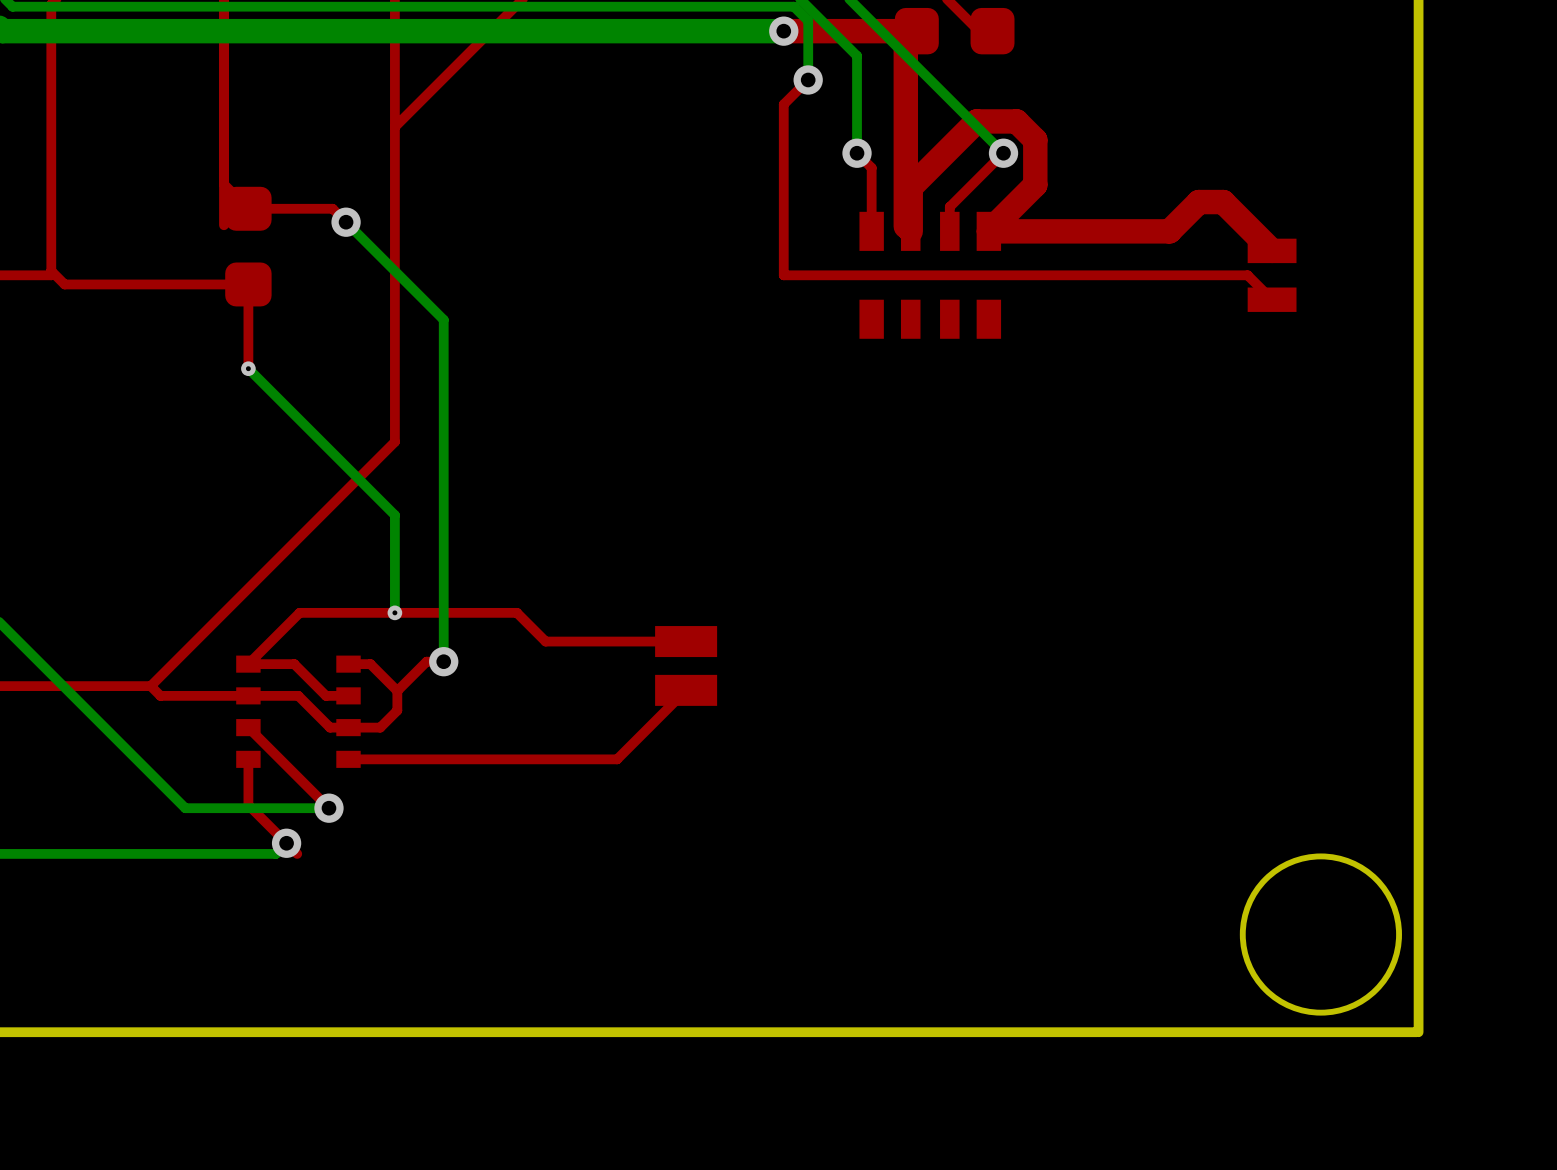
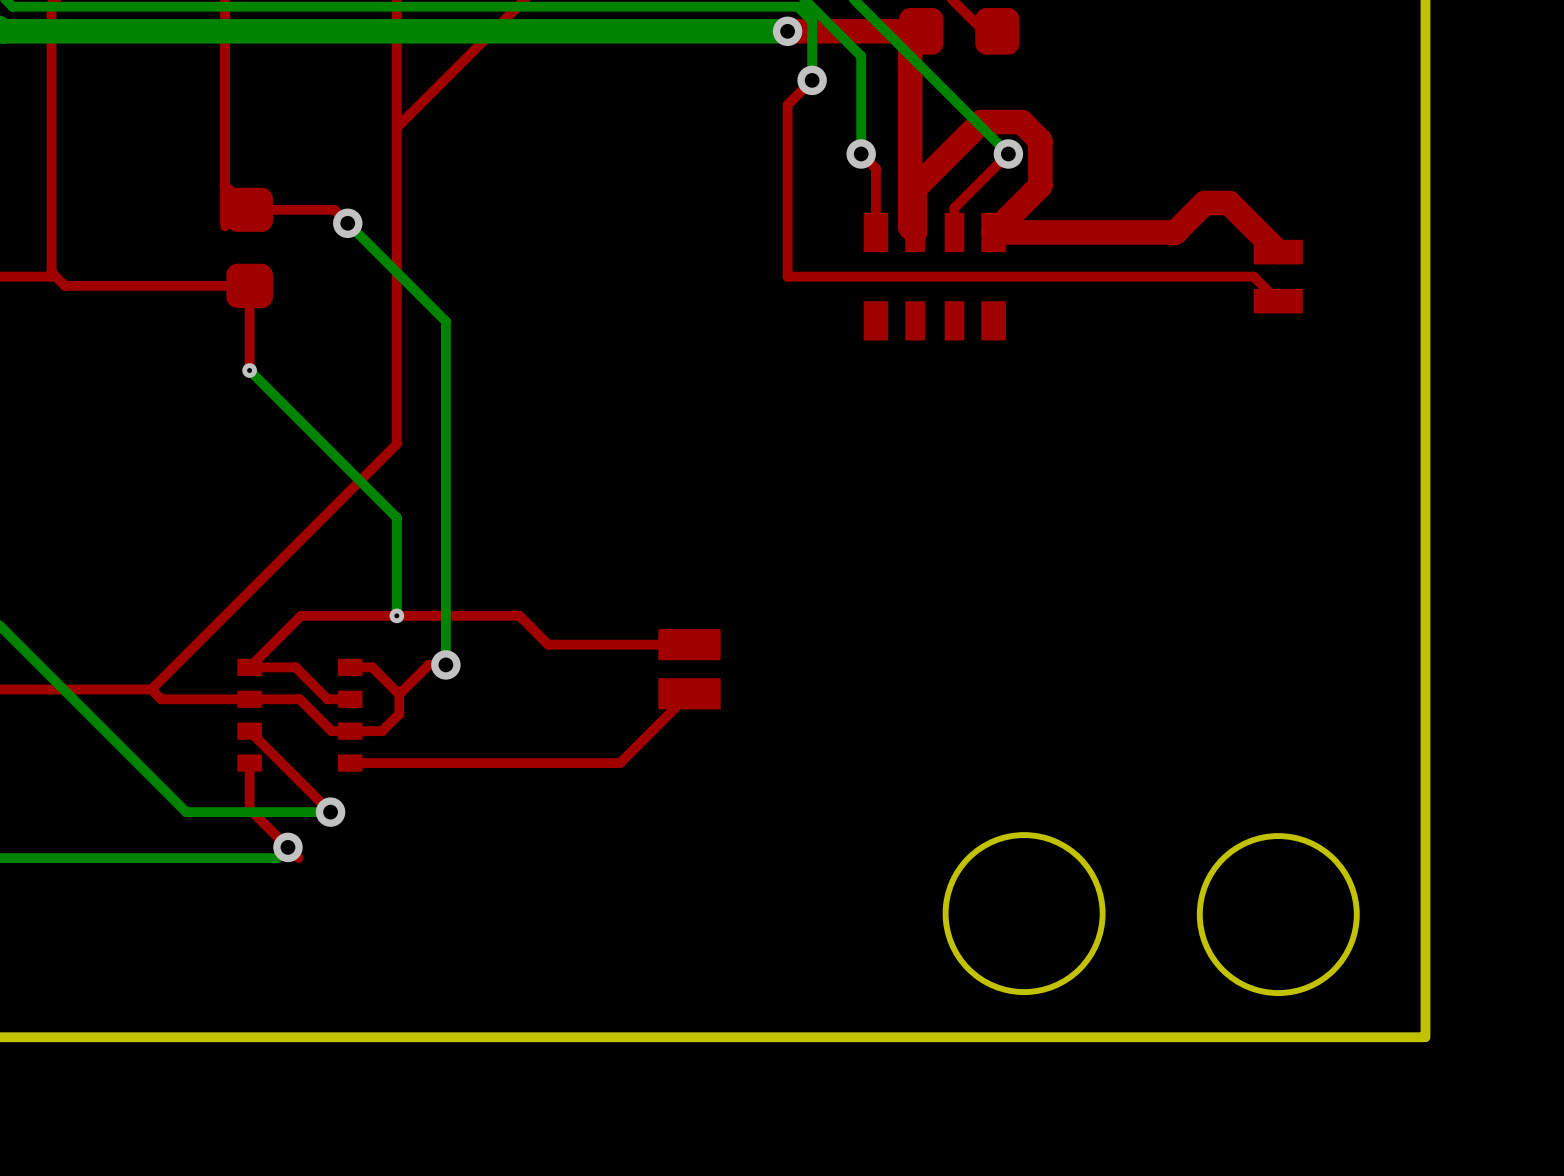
round board edge: none -> [942, 832, 1106, 996]
round board edge position: (1320, 934) -> (1278, 914)

